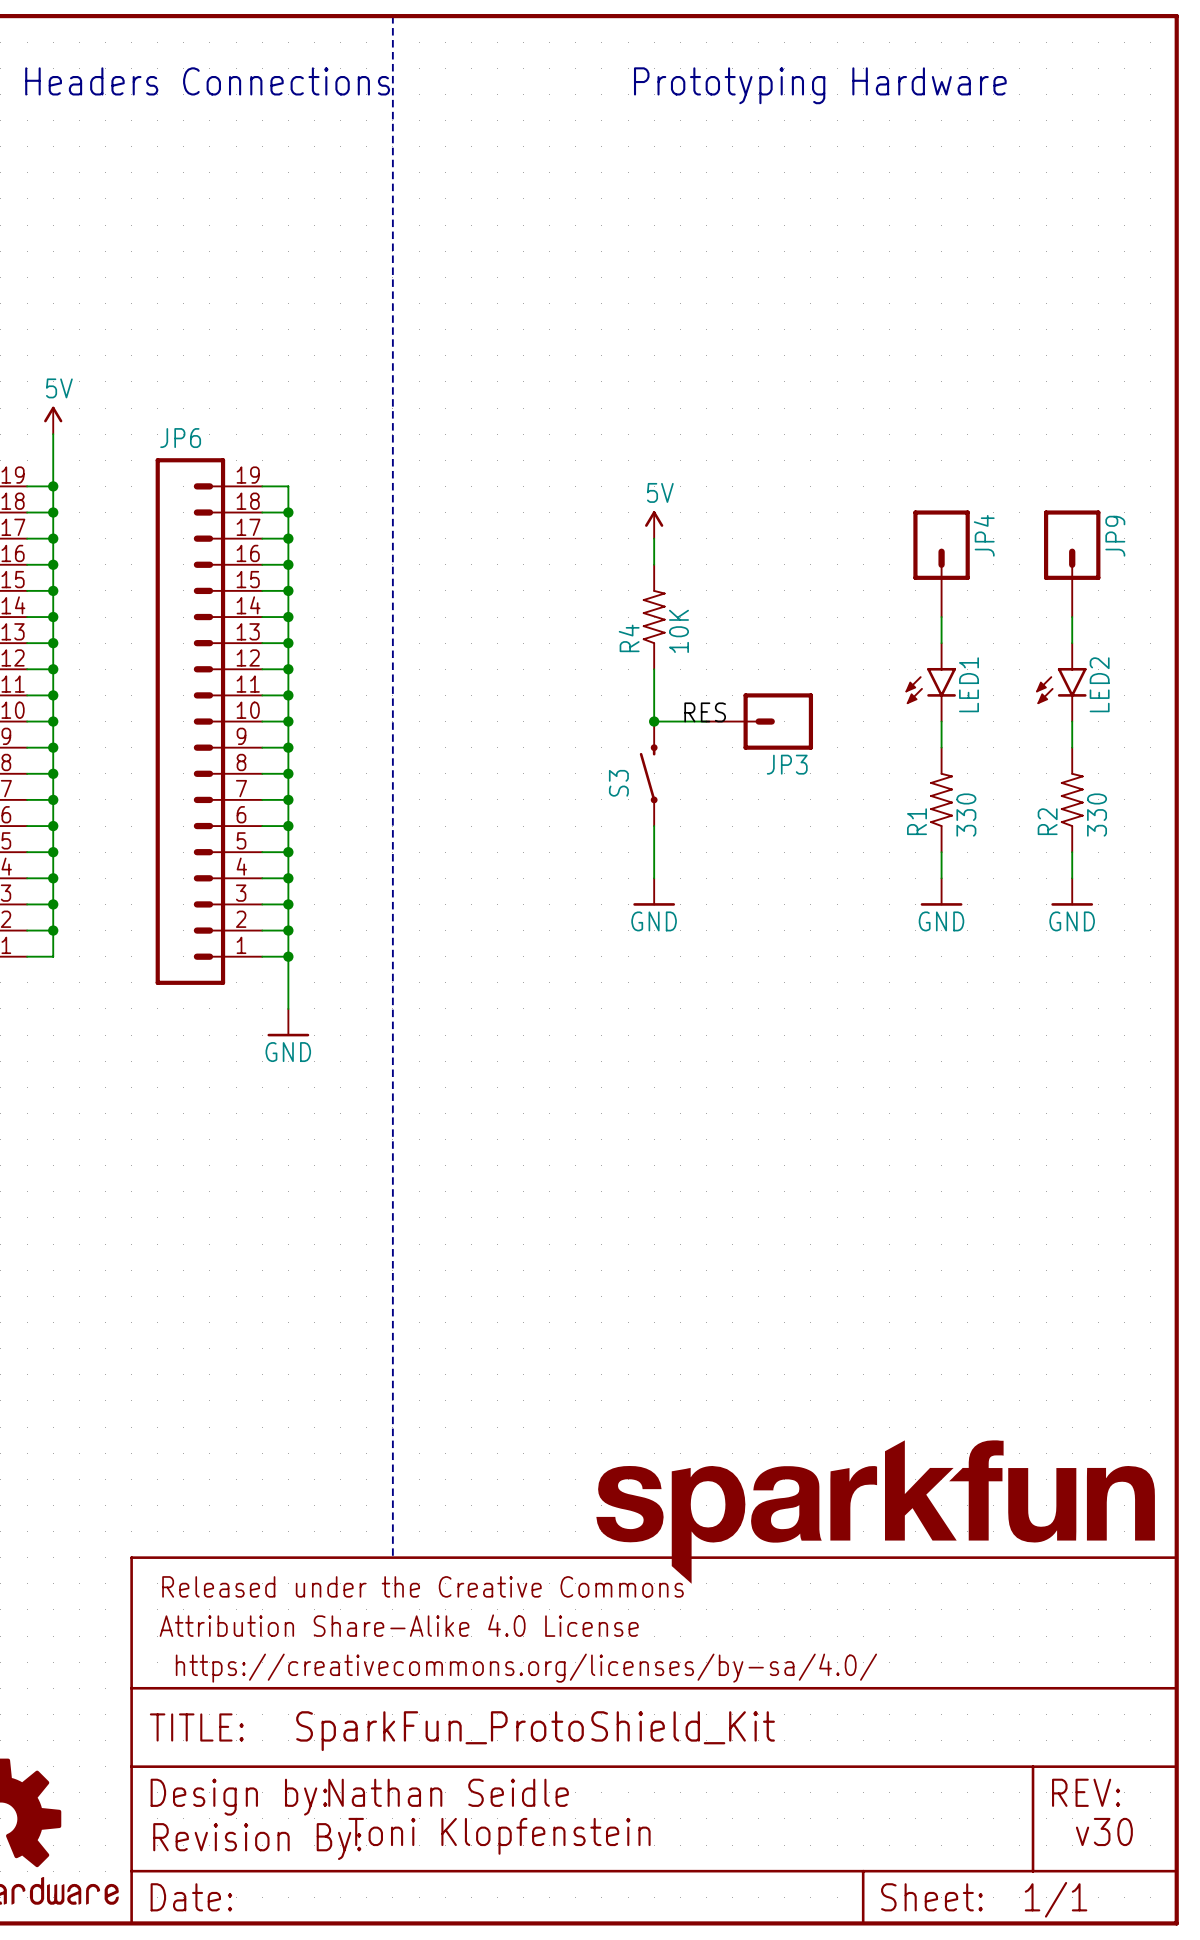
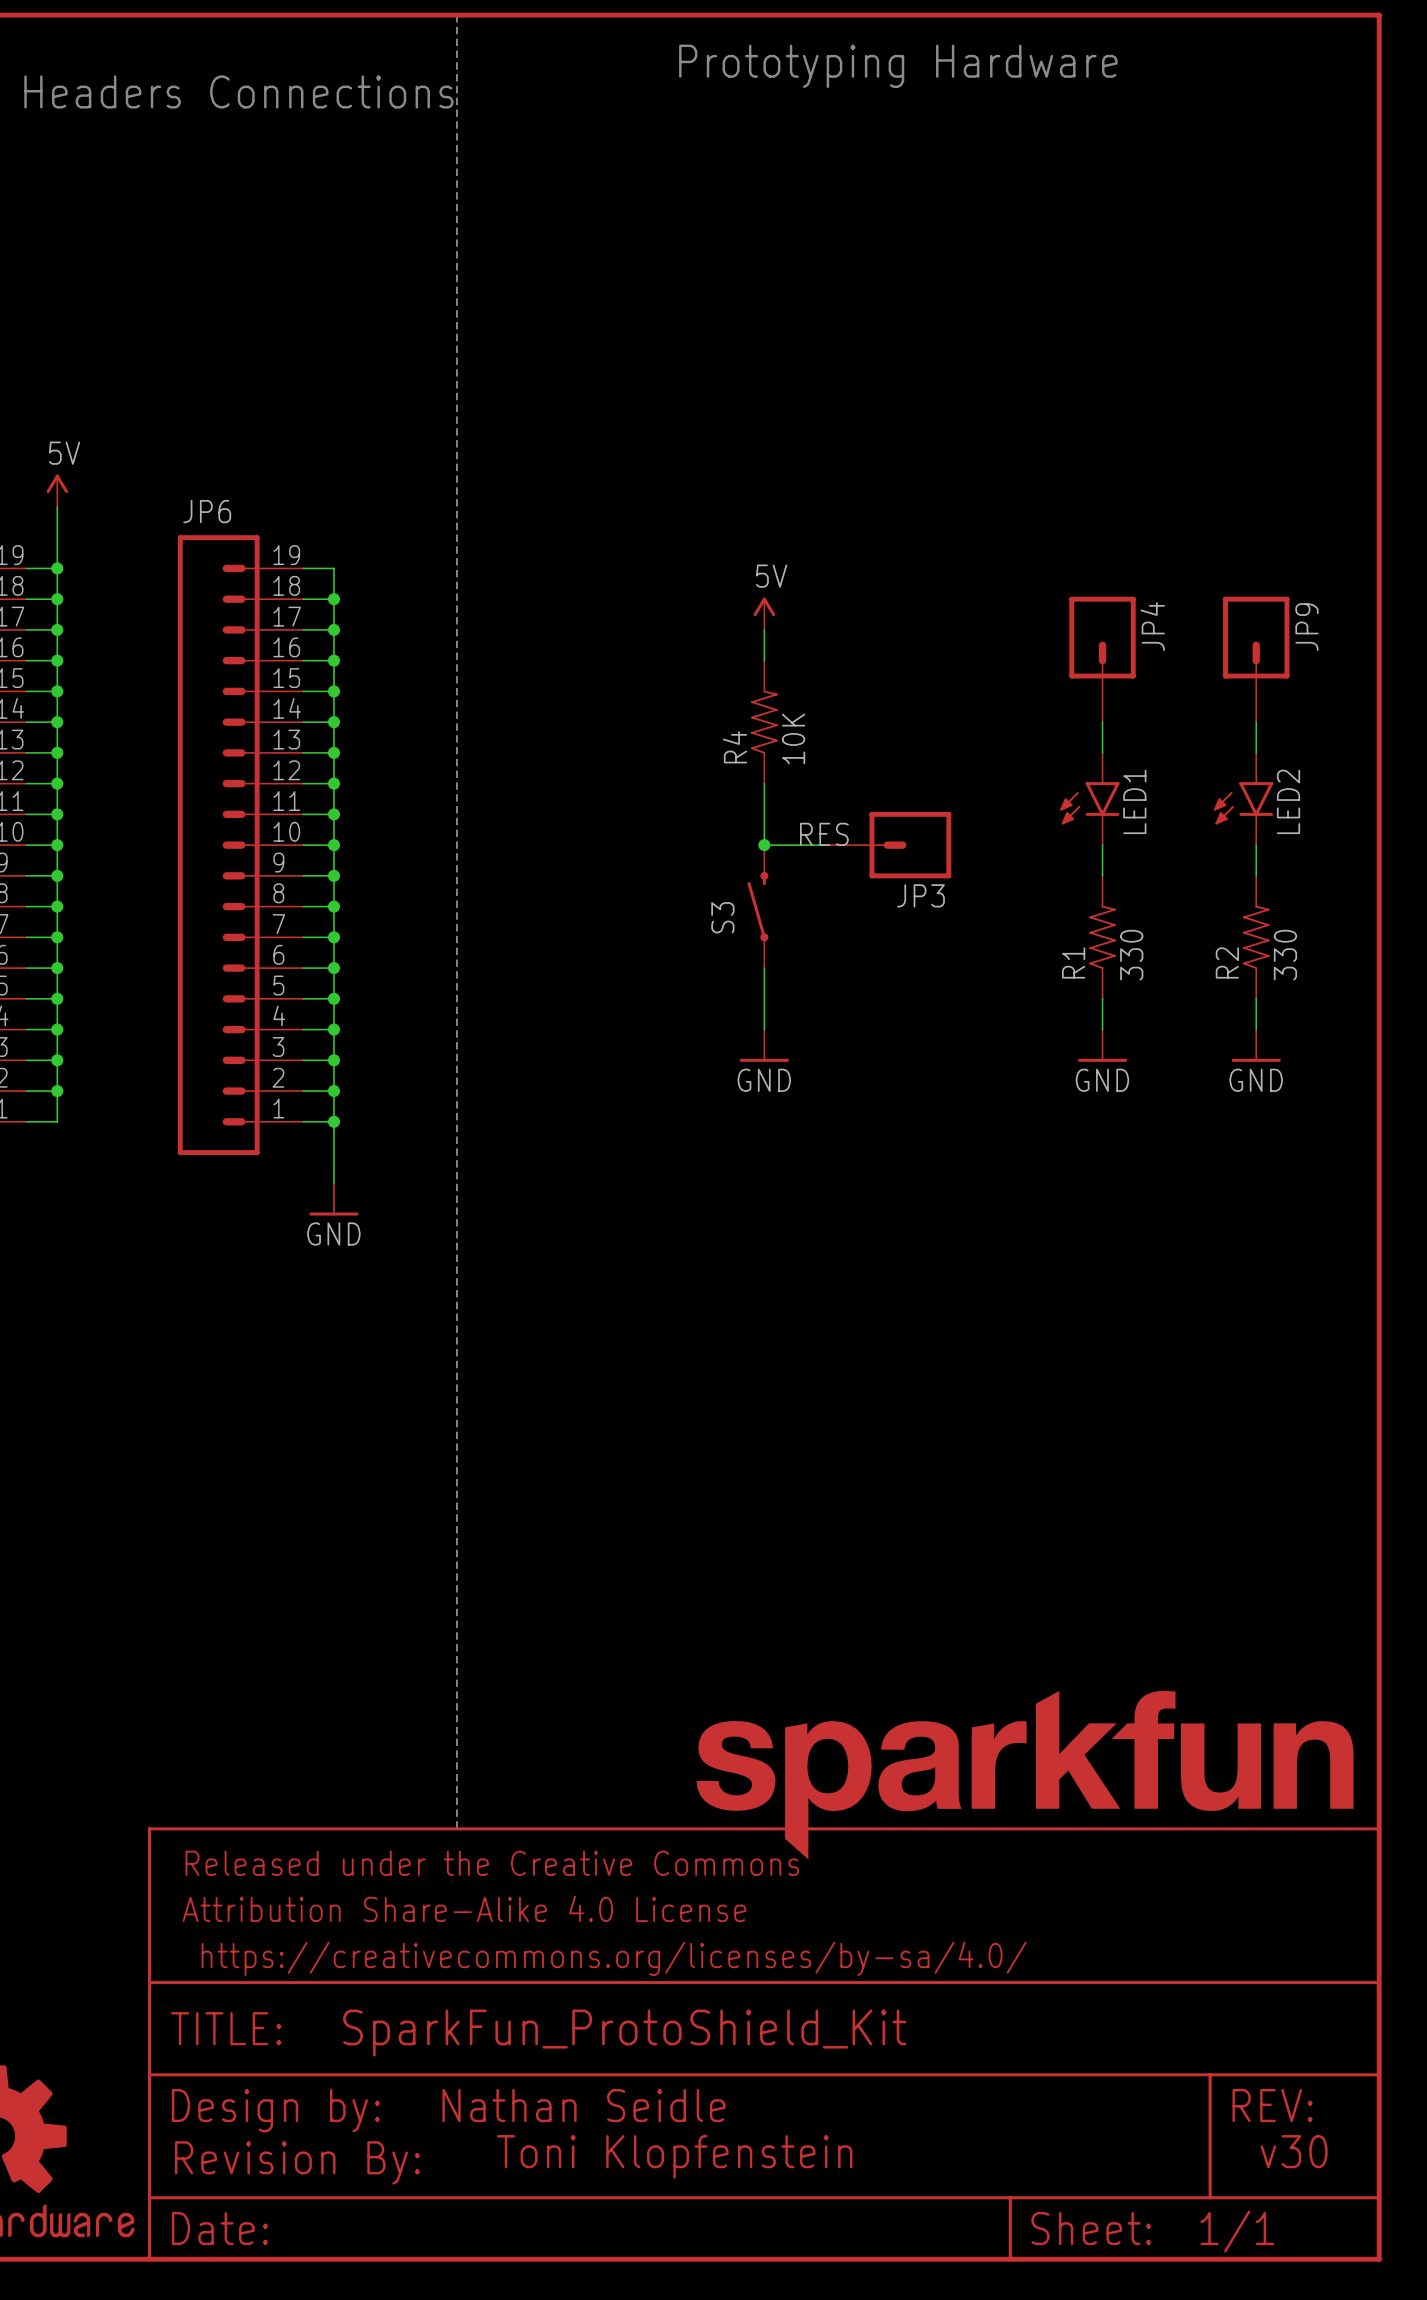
text position: Prototyping Hardware (820, 85) -> Prototyping Hardware (898, 66)
text position: Nathan Seidle (448, 1792) -> Nathan Seidle (583, 2105)
text position: Toni Klopfenstein (499, 1836) -> Toni Klopfenstein (674, 2156)

